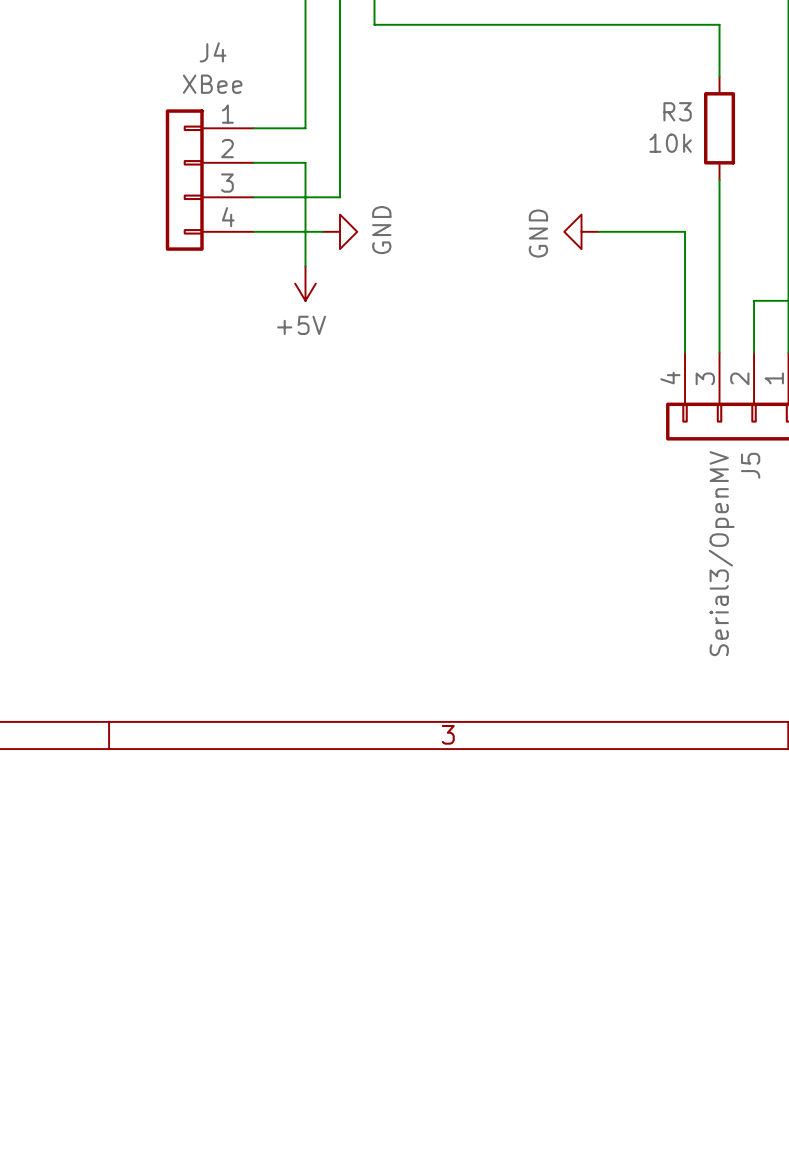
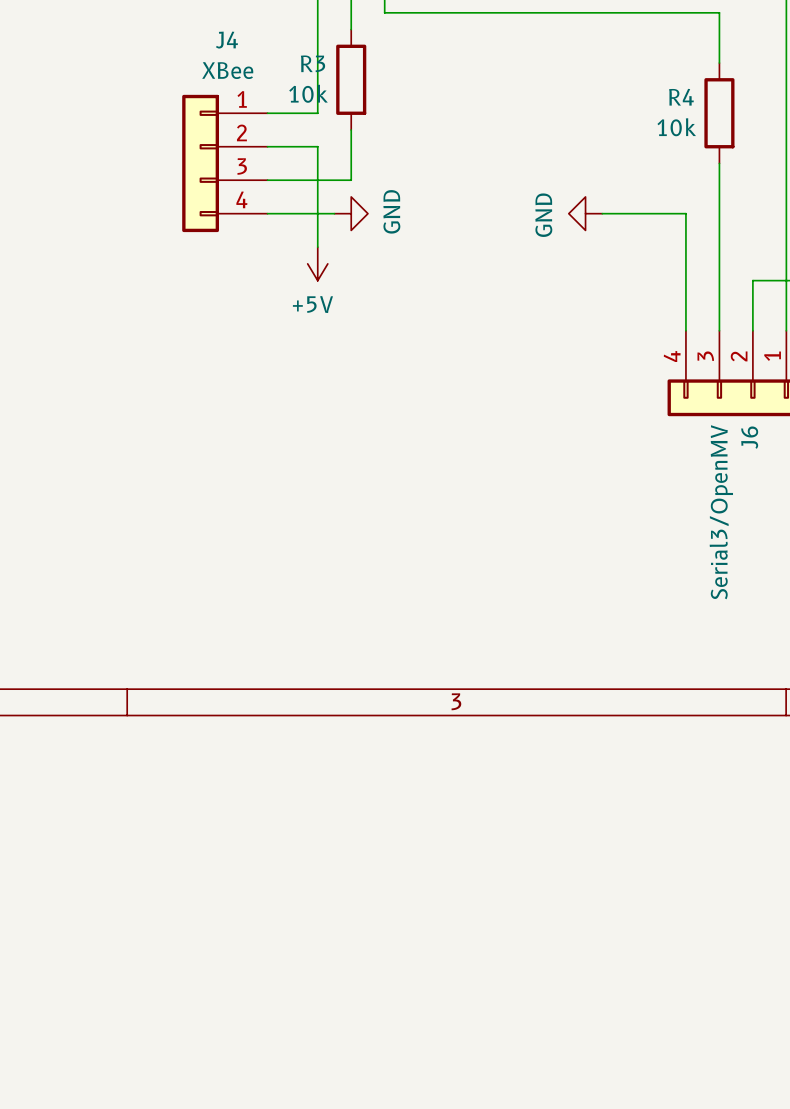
wire: (340, 42) (340, 145) -> none
R3: none -> 10k (351, 79)
R3 name: R3 (677, 111) -> R4 (681, 97)
J5 name: J5 (750, 465) -> J6 (749, 437)

